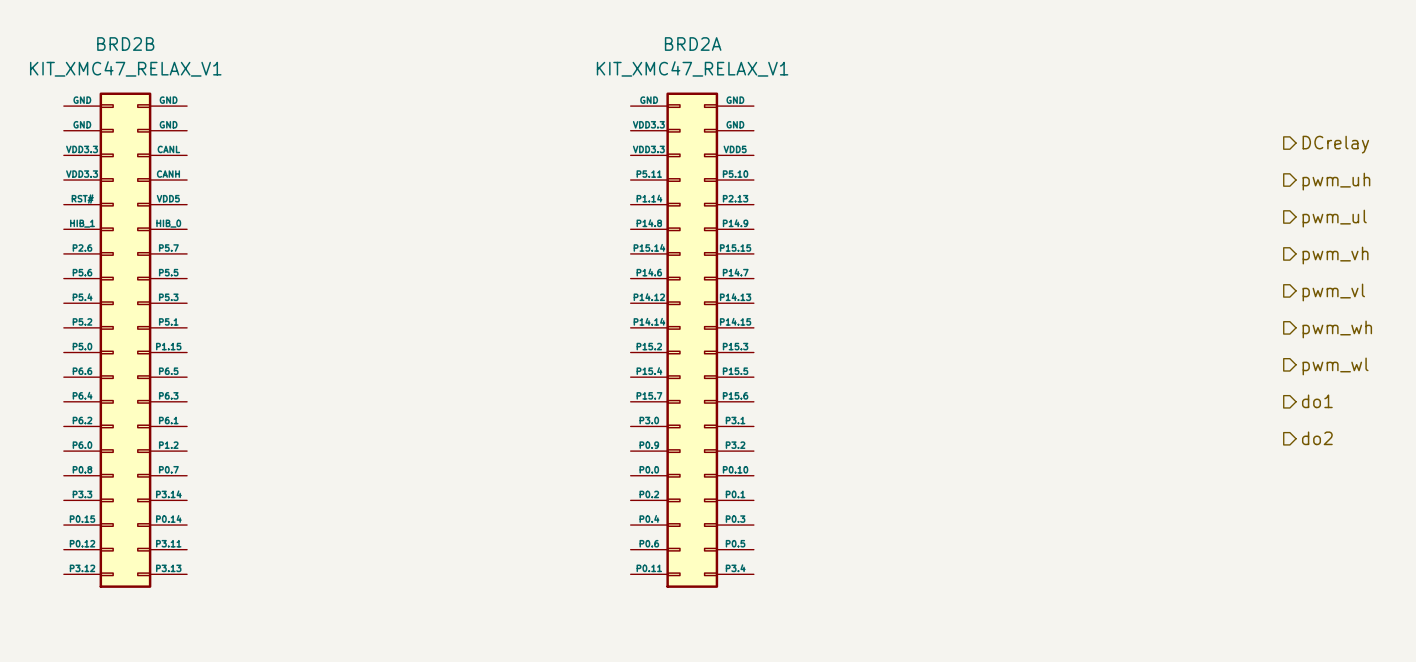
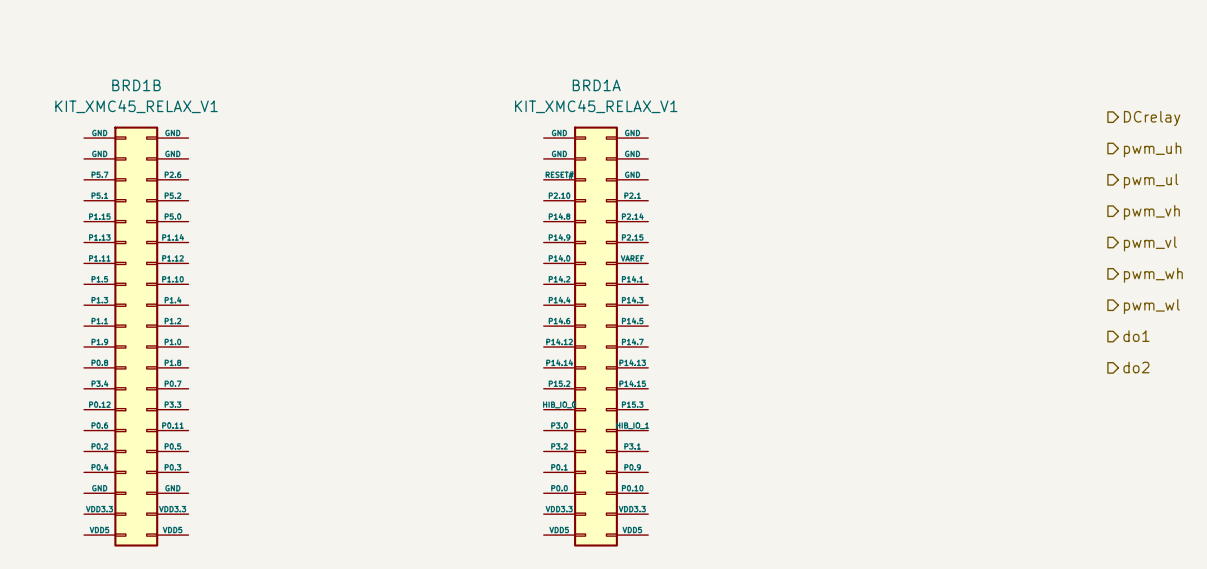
BRD2B: KIT_XMC47_RELAX_V1 (125, 340) -> none
BRD2A: KIT_XMC47_RELAX_V1 (692, 340) -> none
BRD1B: none -> KIT_XMC45_RELAX_V1 (136, 336)
BRD1A: none -> KIT_XMC45_RELAX_V1 (595, 336)

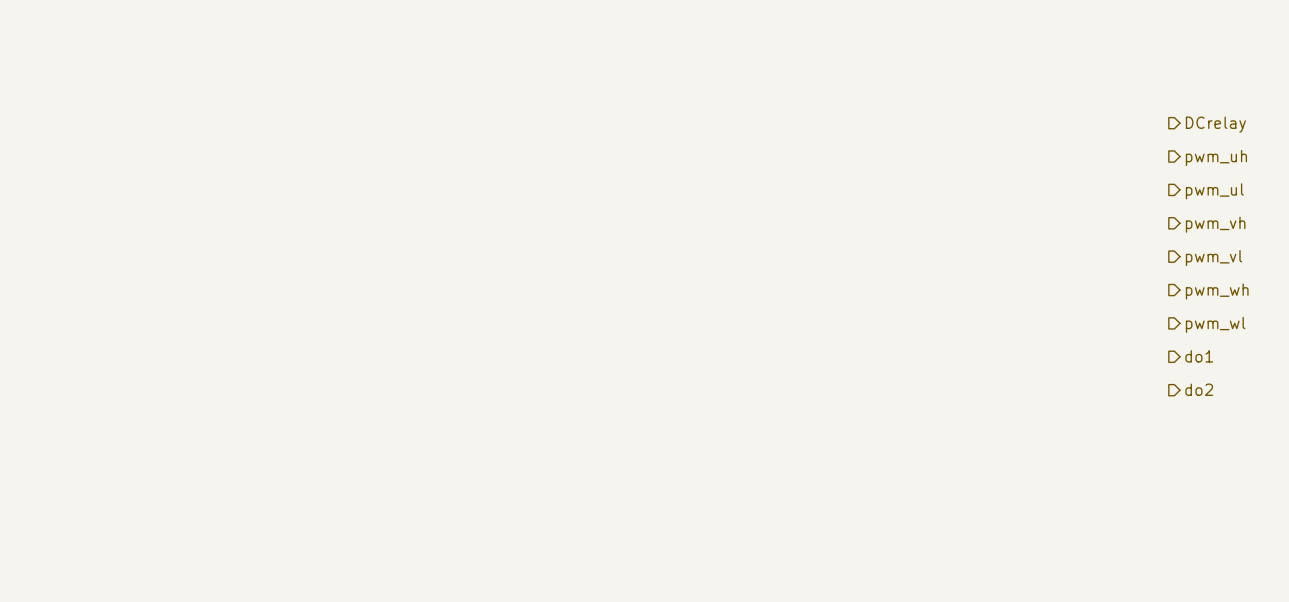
BRD1B: KIT_XMC45_RELAX_V1 (136, 336) -> none
BRD1A: KIT_XMC45_RELAX_V1 (595, 336) -> none

